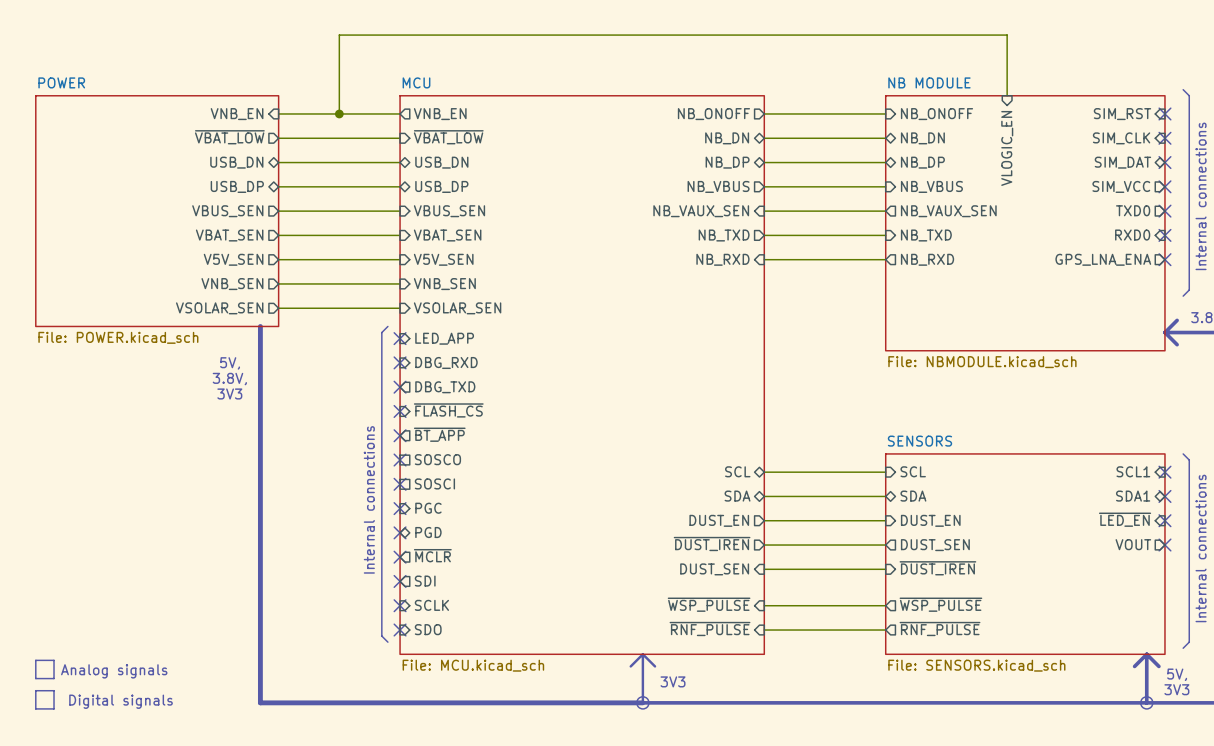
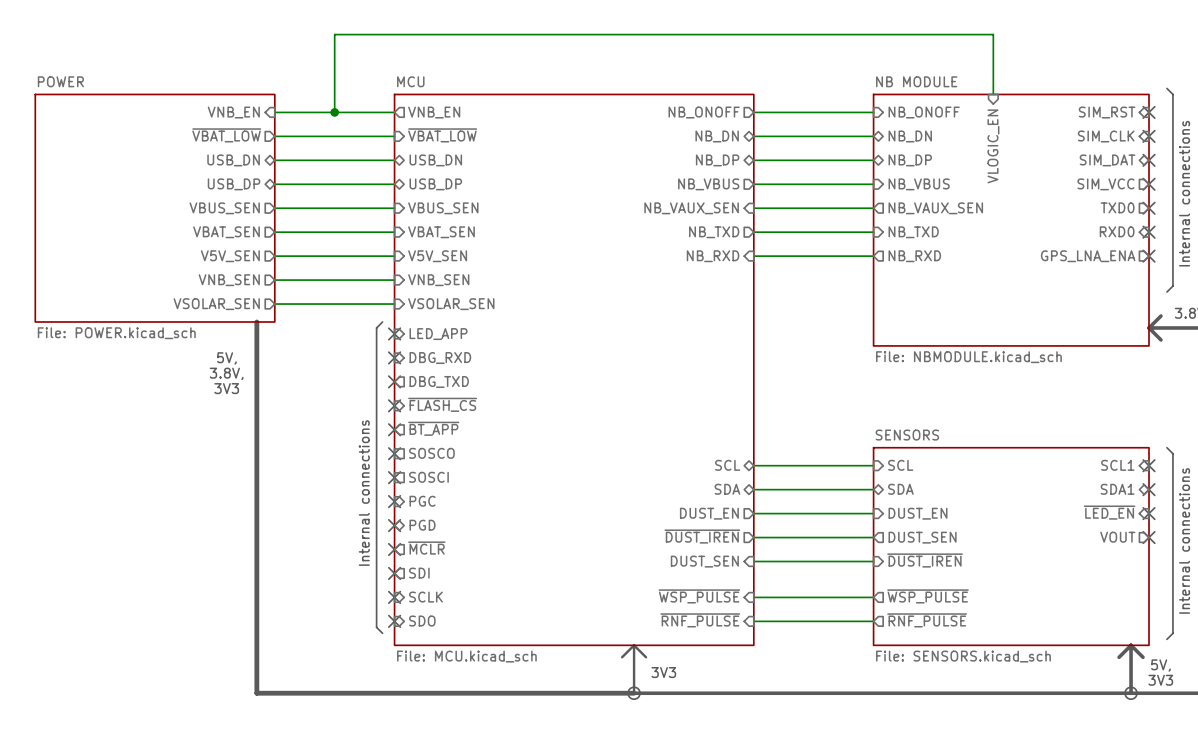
line: (35, 660) (54, 660) (54, 678) (35, 678) (35, 660) -> none
text: Analog signals (114, 671) -> none
line: (35, 690) (35, 708) (54, 708) (54, 690) (35, 690) -> none
text: Digital signals (121, 701) -> none

